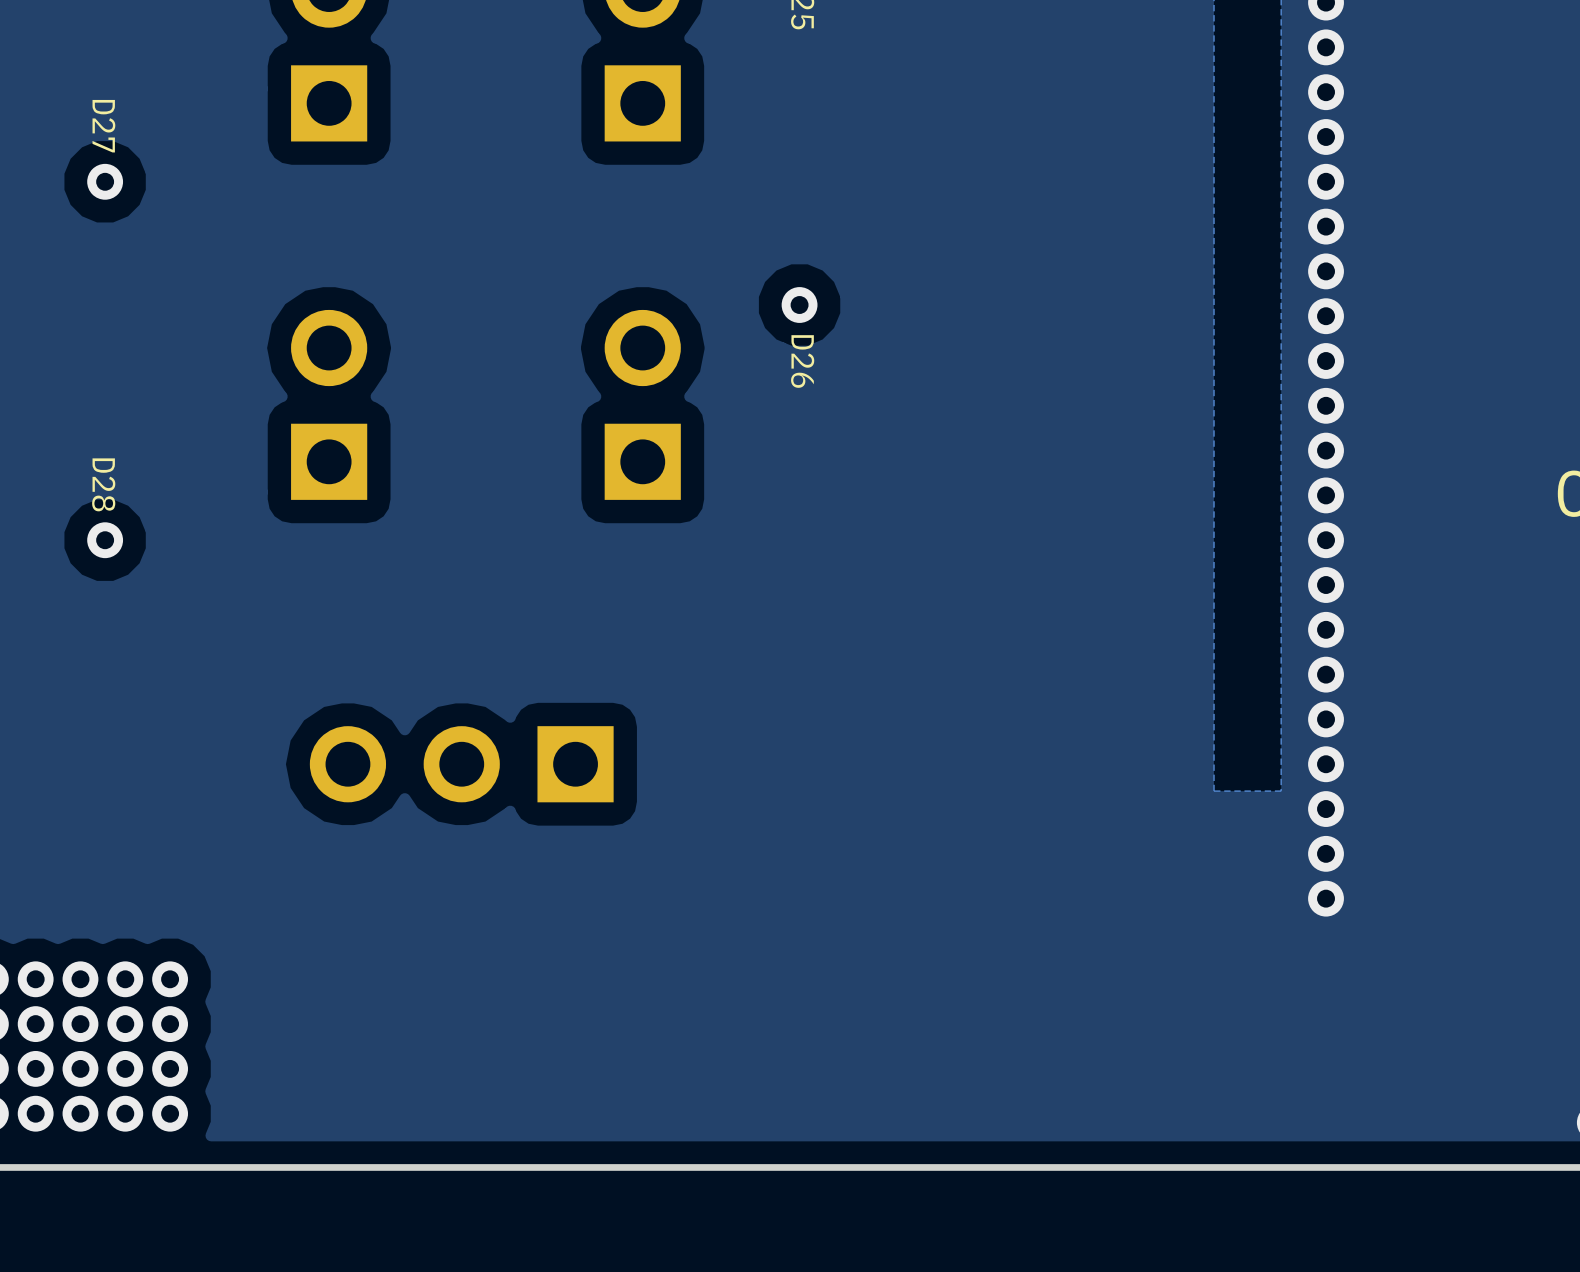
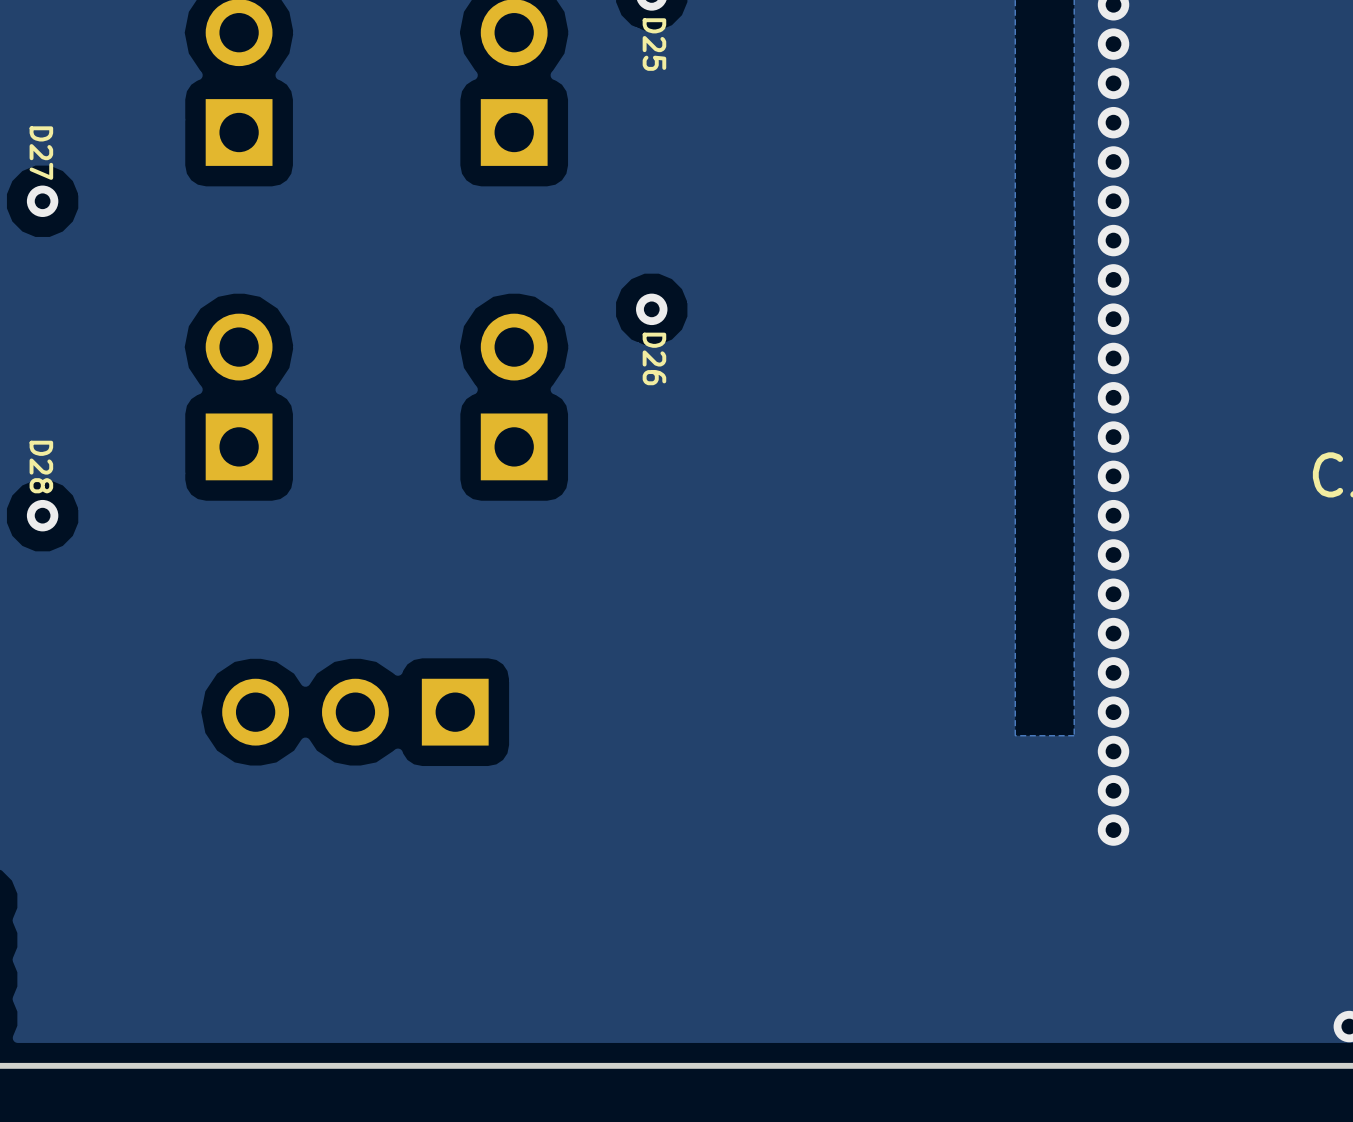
via: (80, 979) -> none
via: (125, 979) -> none
via: (170, 979) -> none
via: (80, 1024) -> none
via: (125, 1024) -> none
via: (170, 1024) -> none
via: (80, 1068) -> none
via: (125, 1068) -> none
via: (170, 1068) -> none
via: (80, 1113) -> none
via: (125, 1113) -> none
via: (170, 1113) -> none

